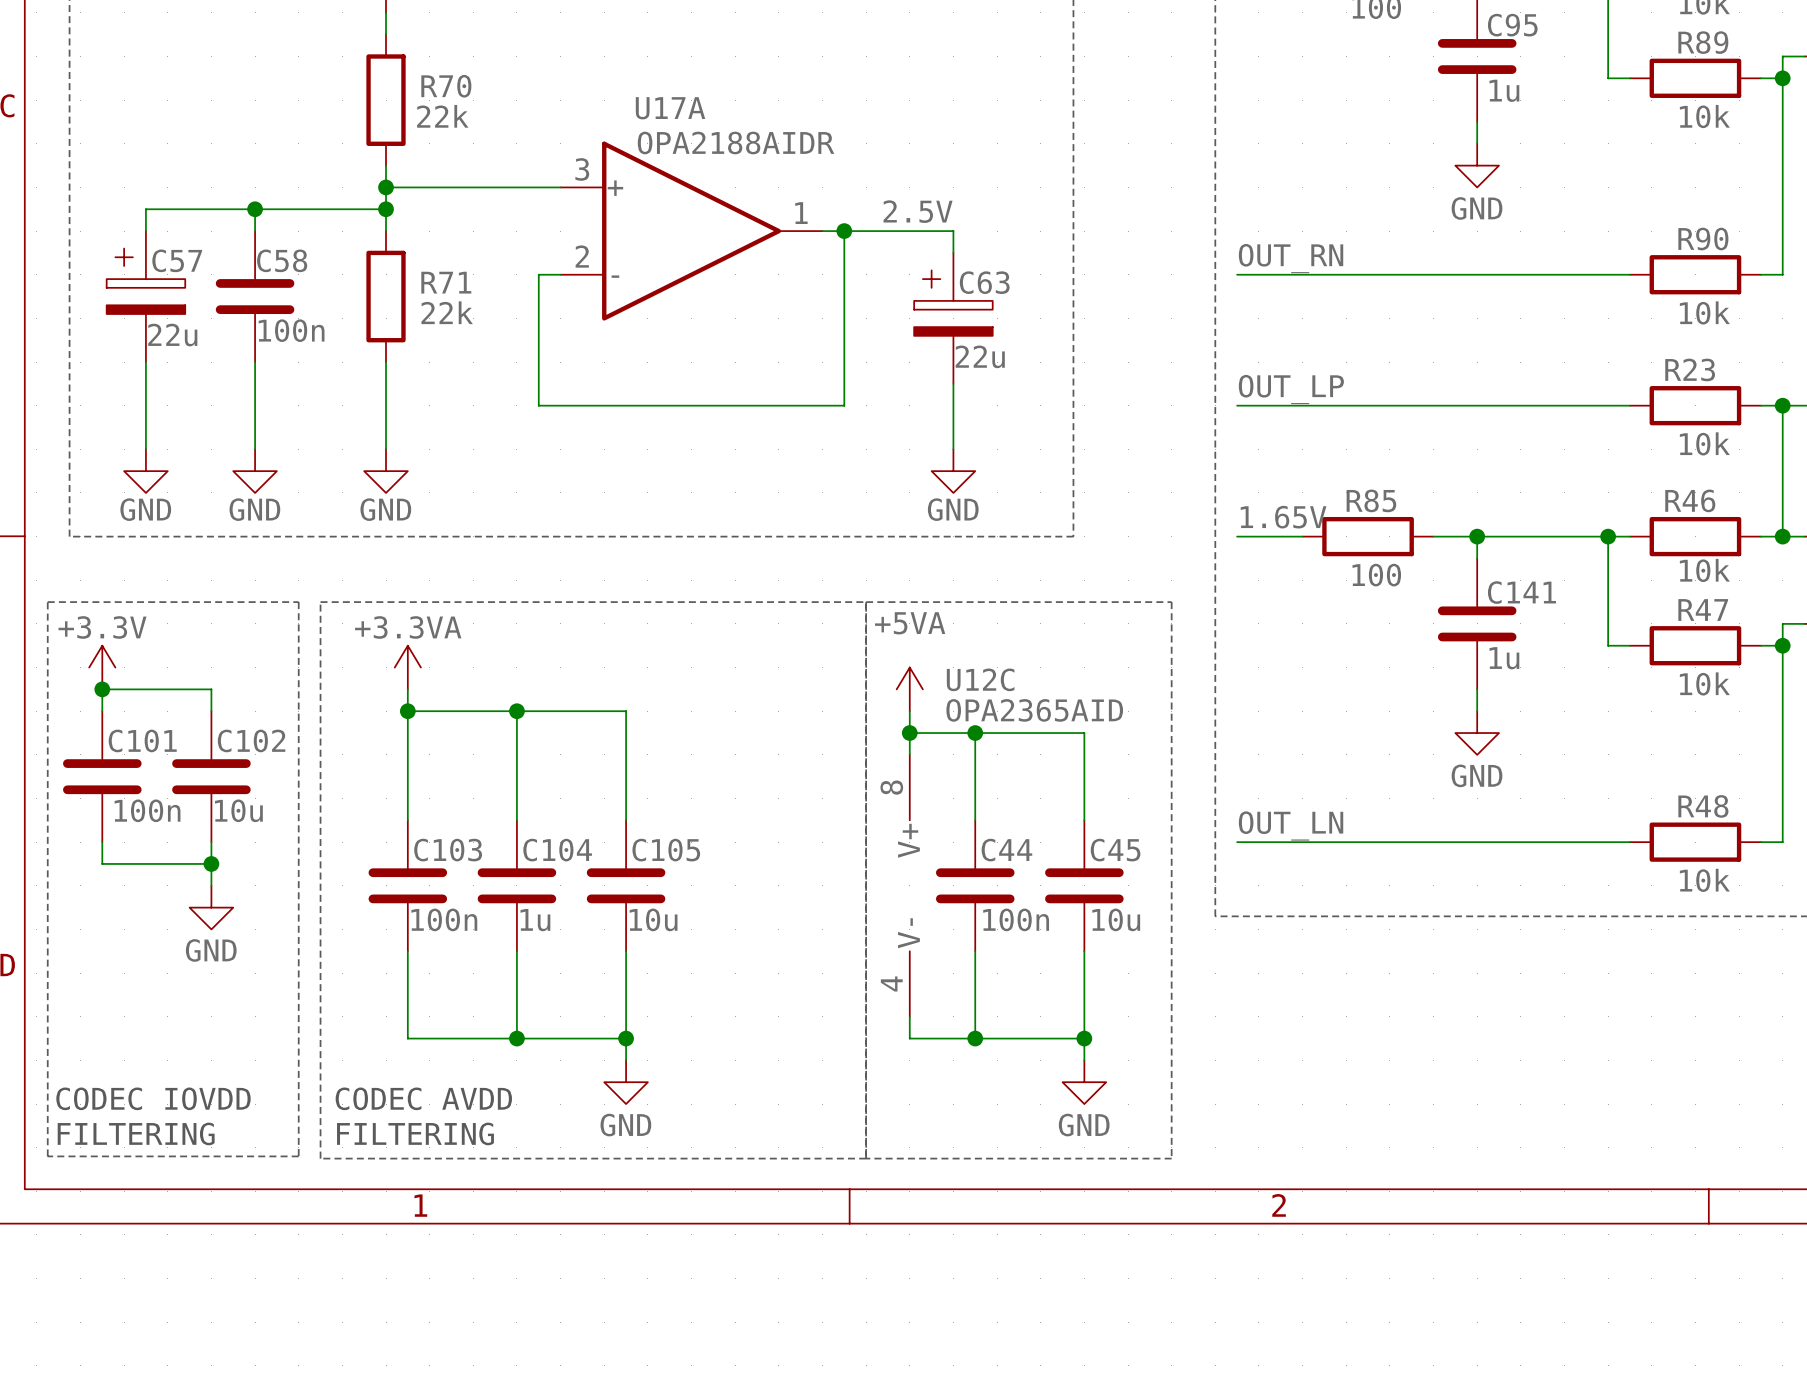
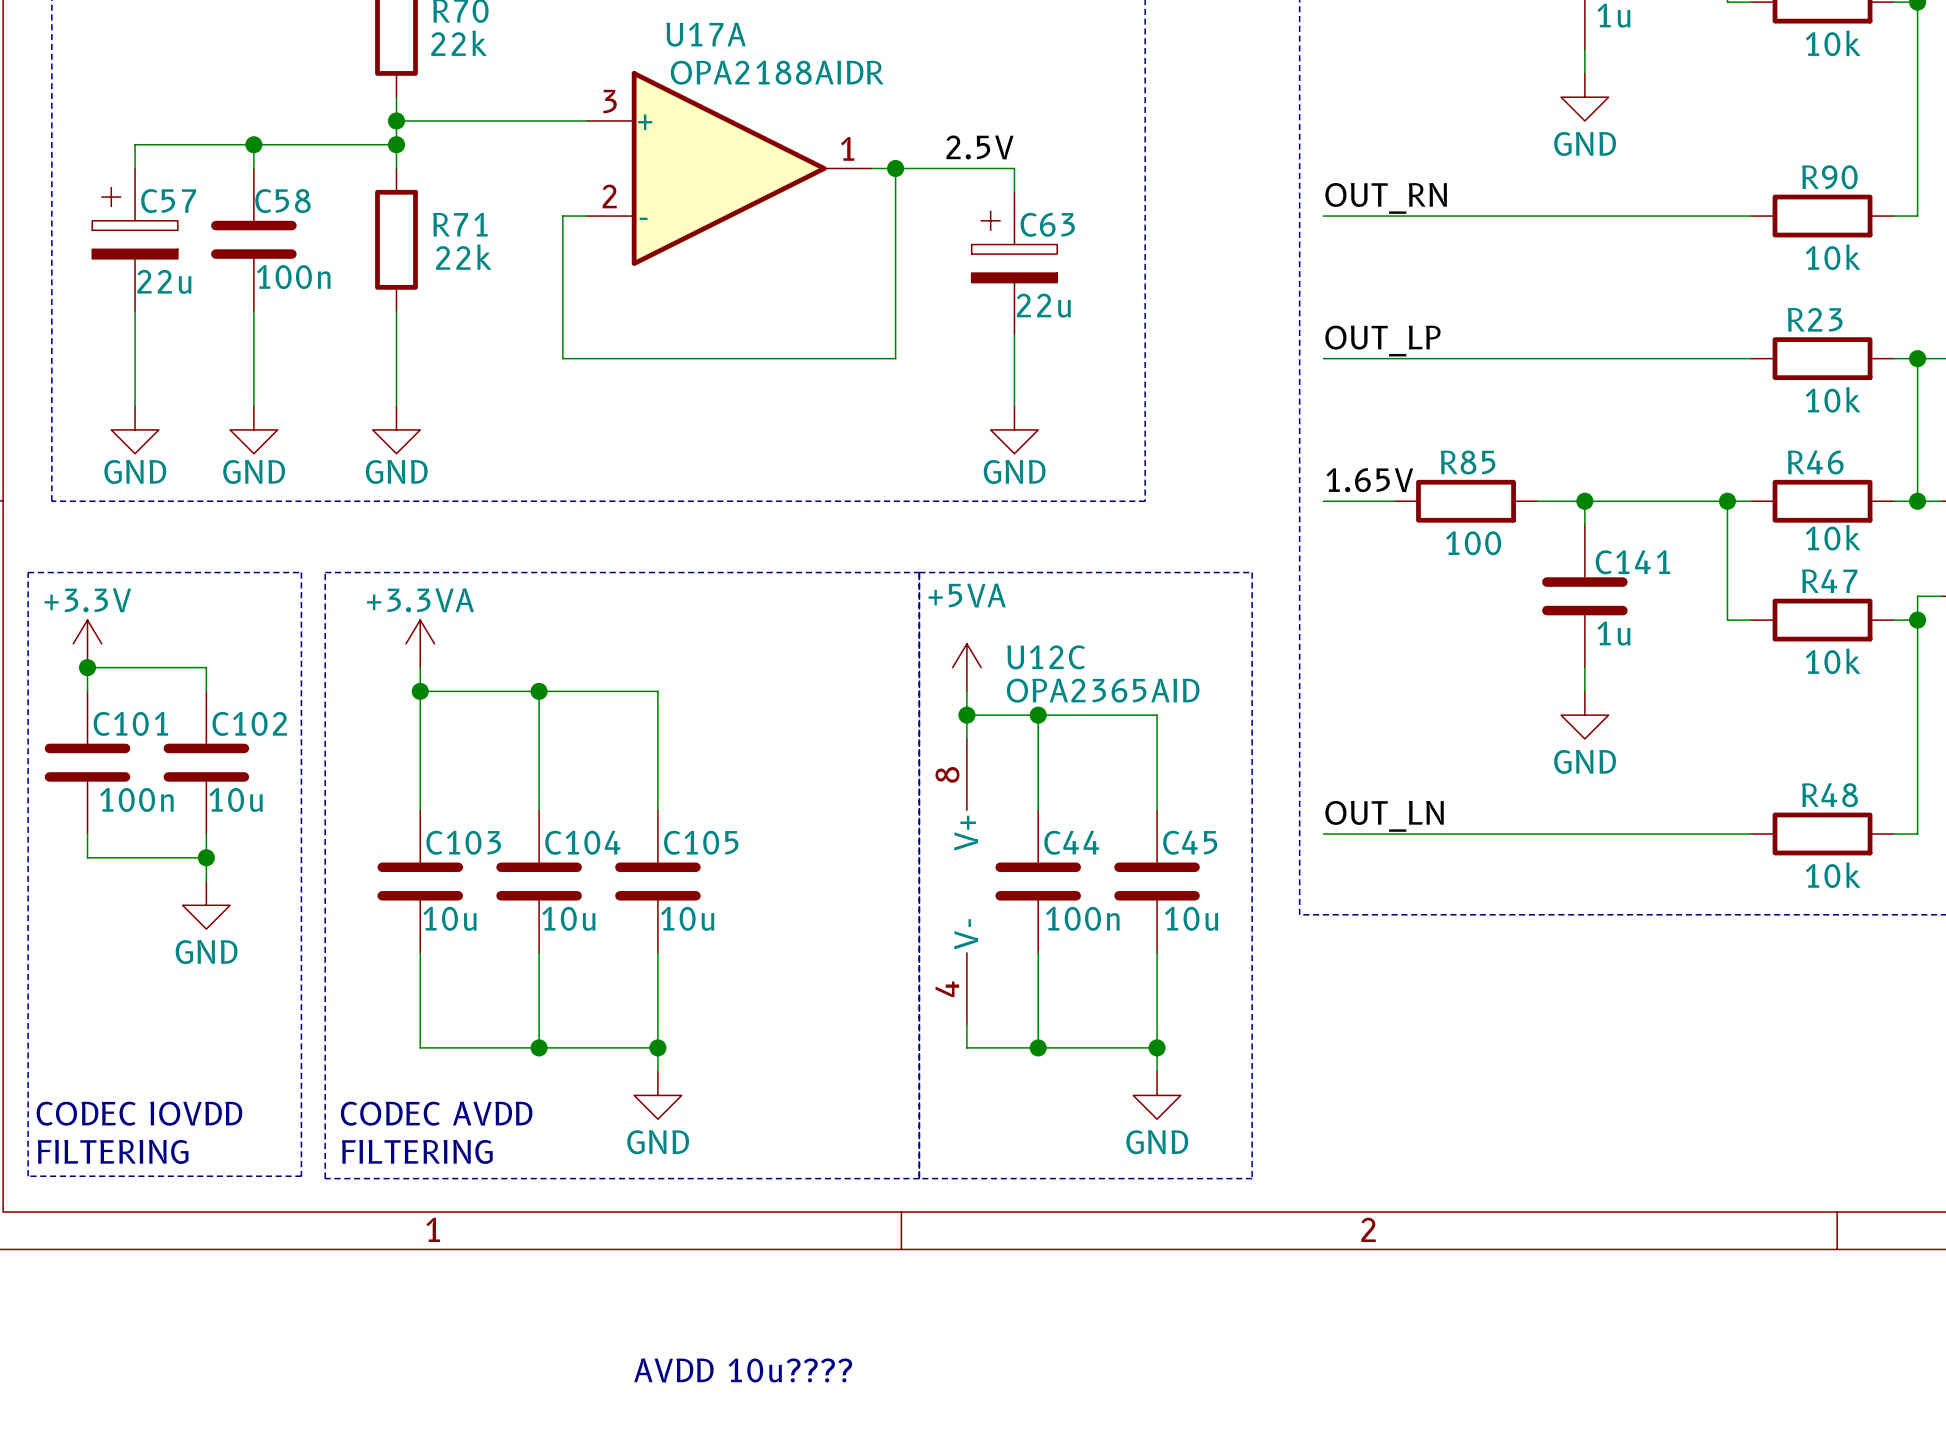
C103 value: 100n (444, 919) -> 10u (449, 918)
C104 value: 1u (535, 920) -> 10u (568, 918)
text: none -> AVDD 10u???? (743, 1370)

